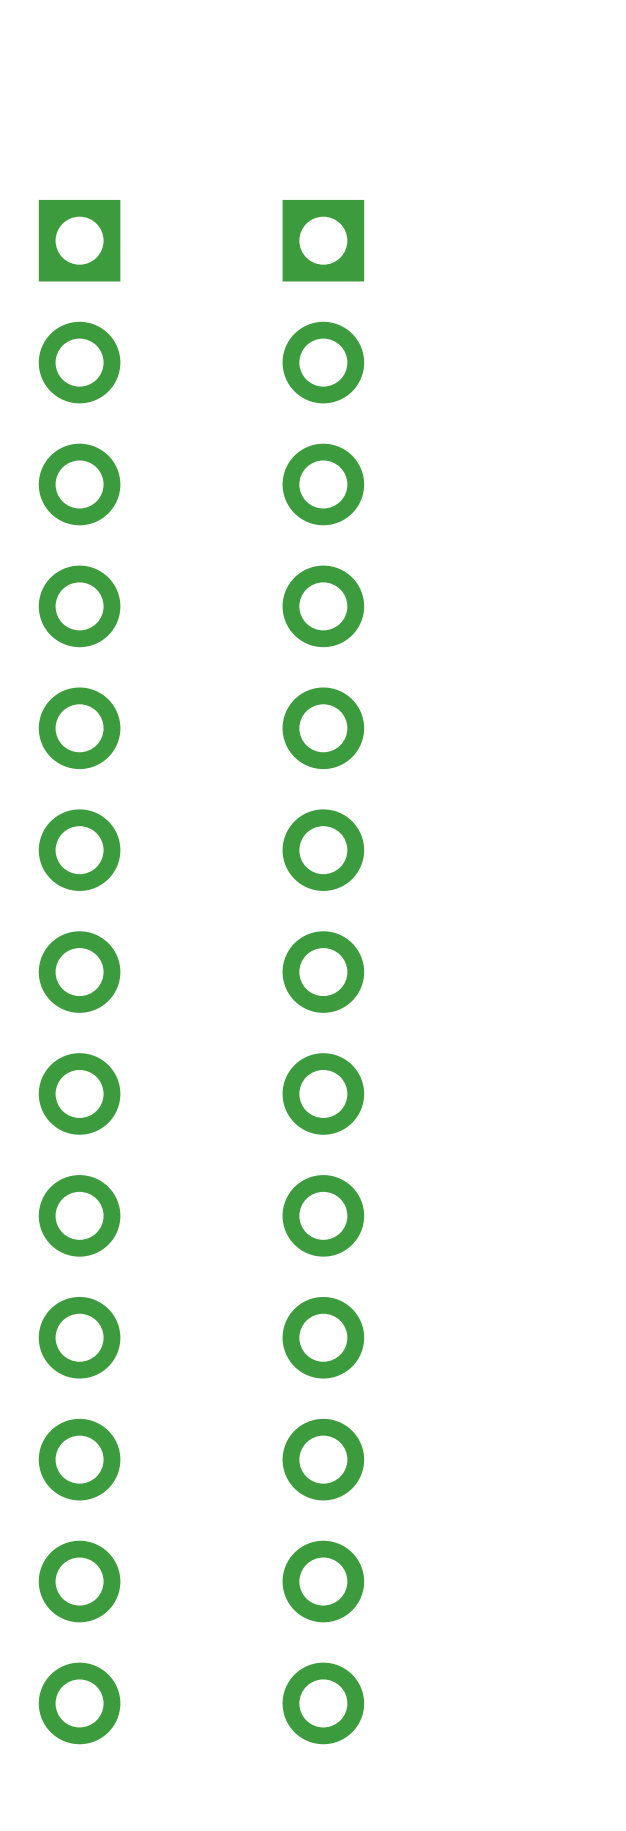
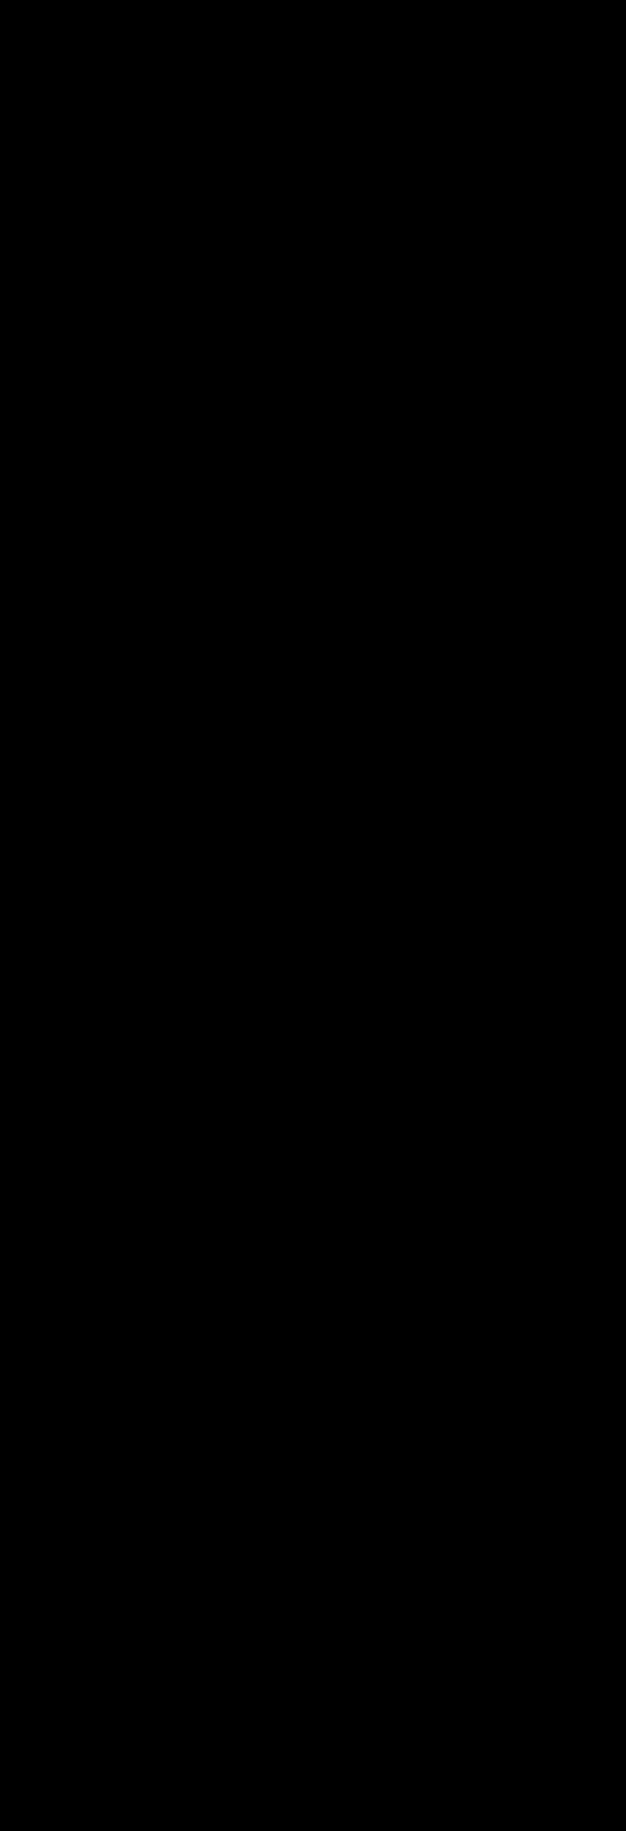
part: (79, 972) -> none
part: (323, 972) -> none

